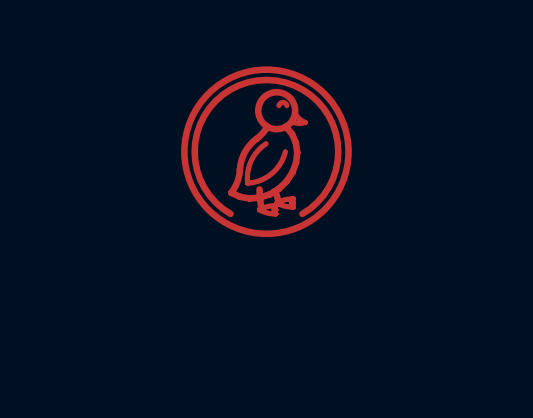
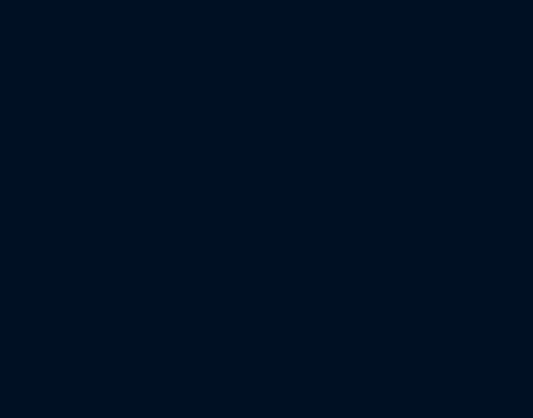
drawing: [181, 66, 352, 238] -> none

